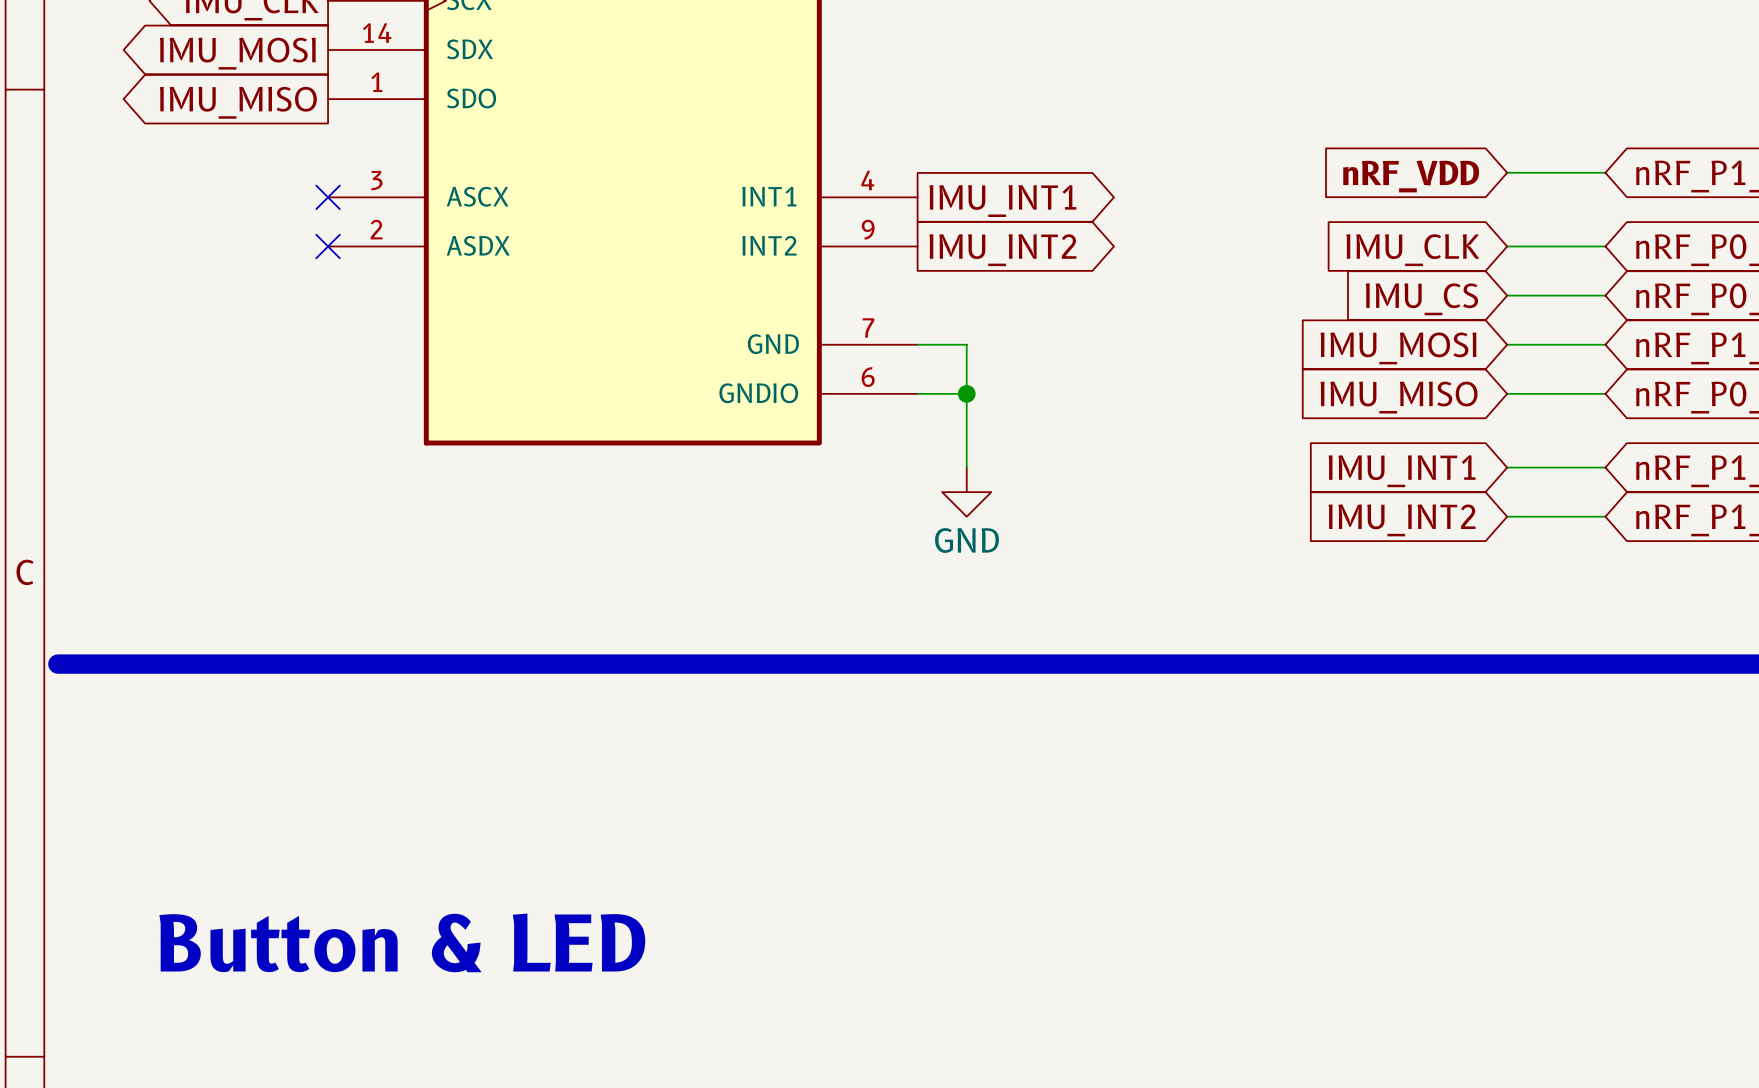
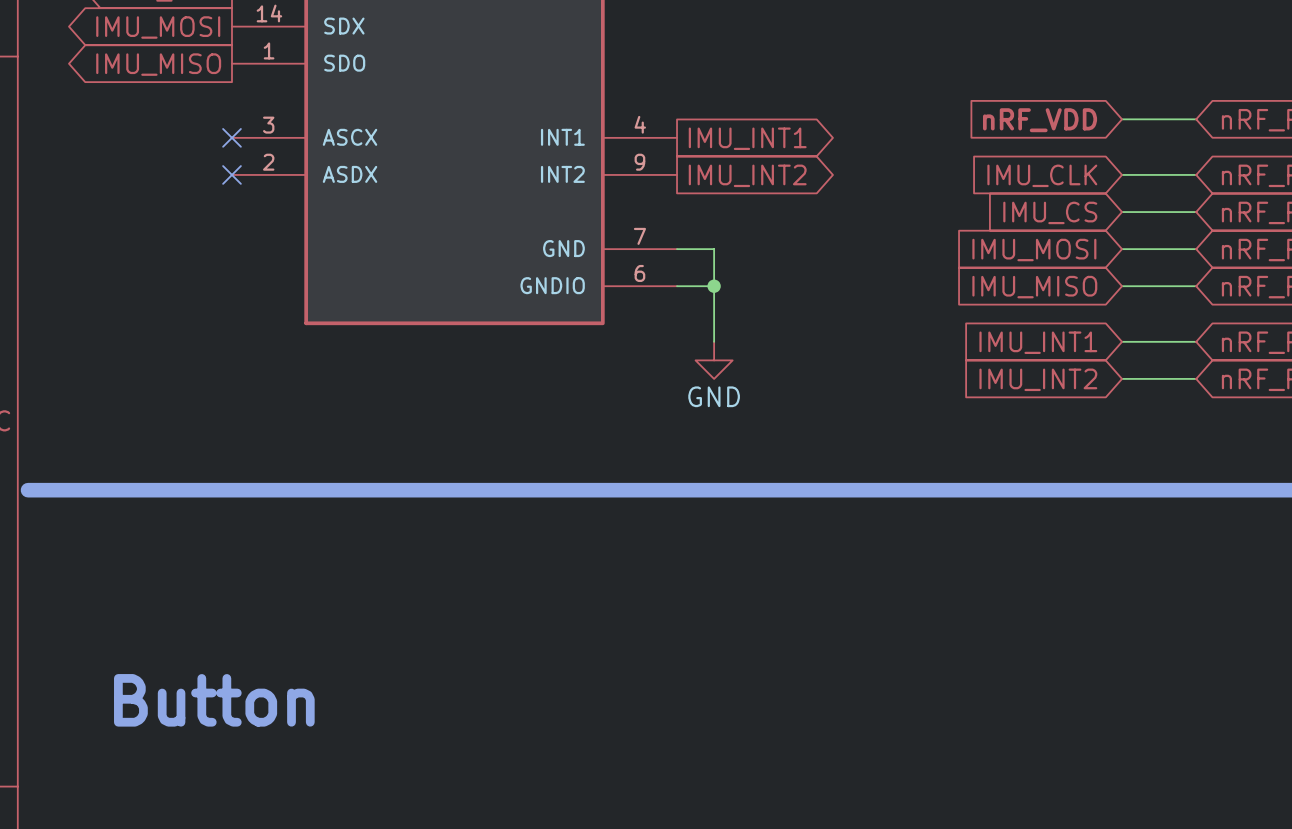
text: Button & LED (402, 942) -> Button (214, 700)

